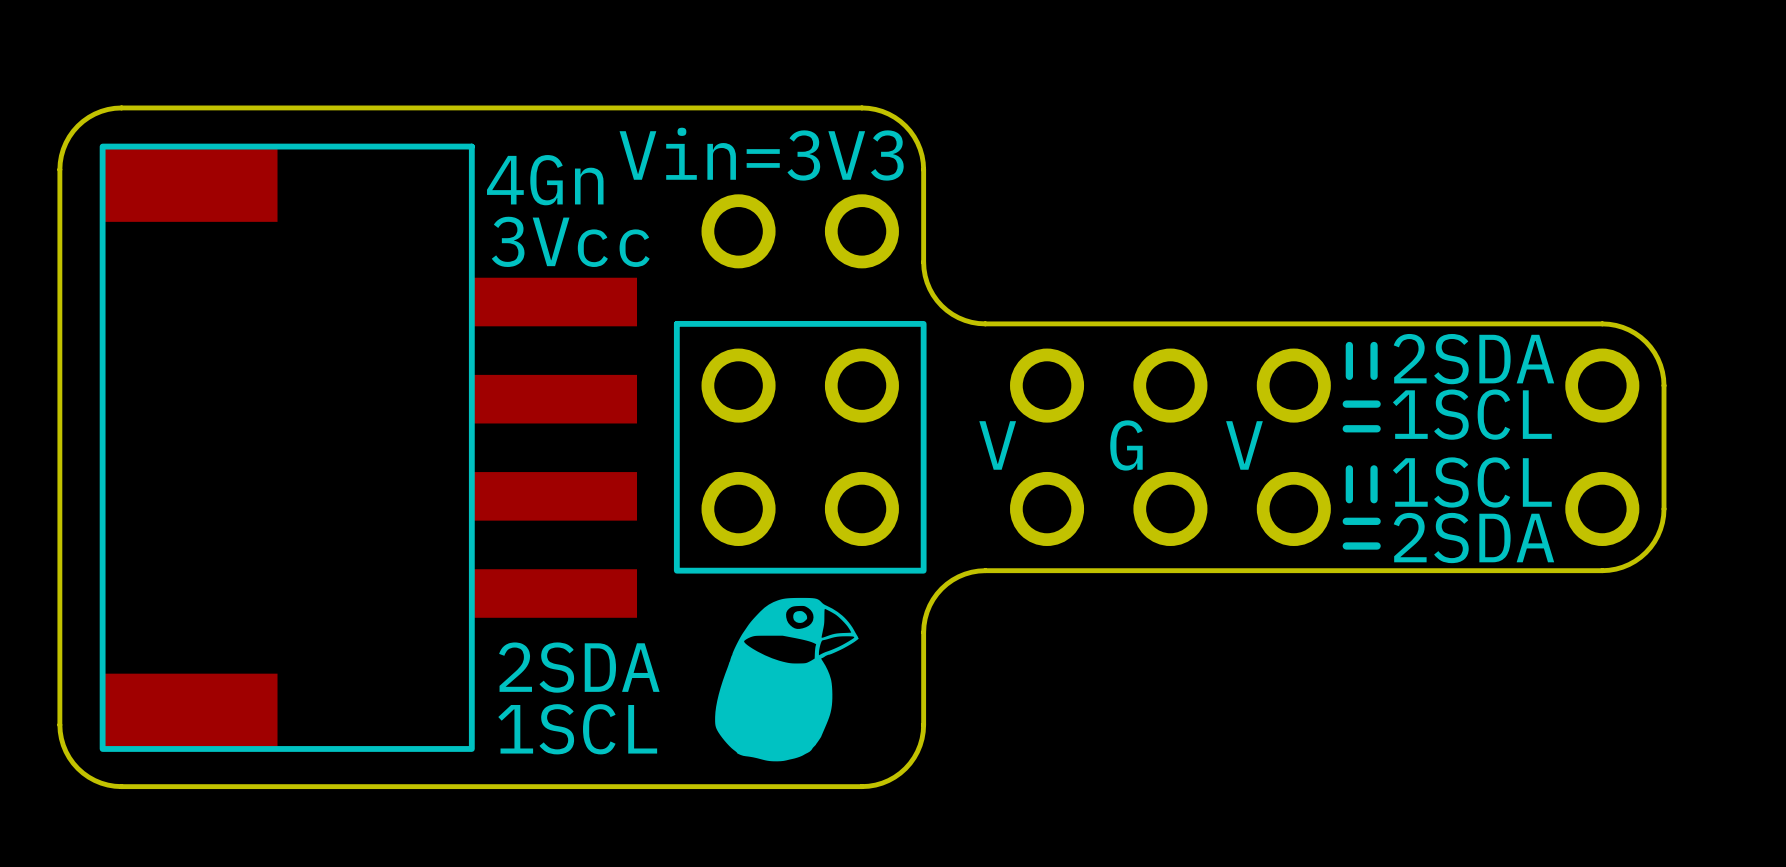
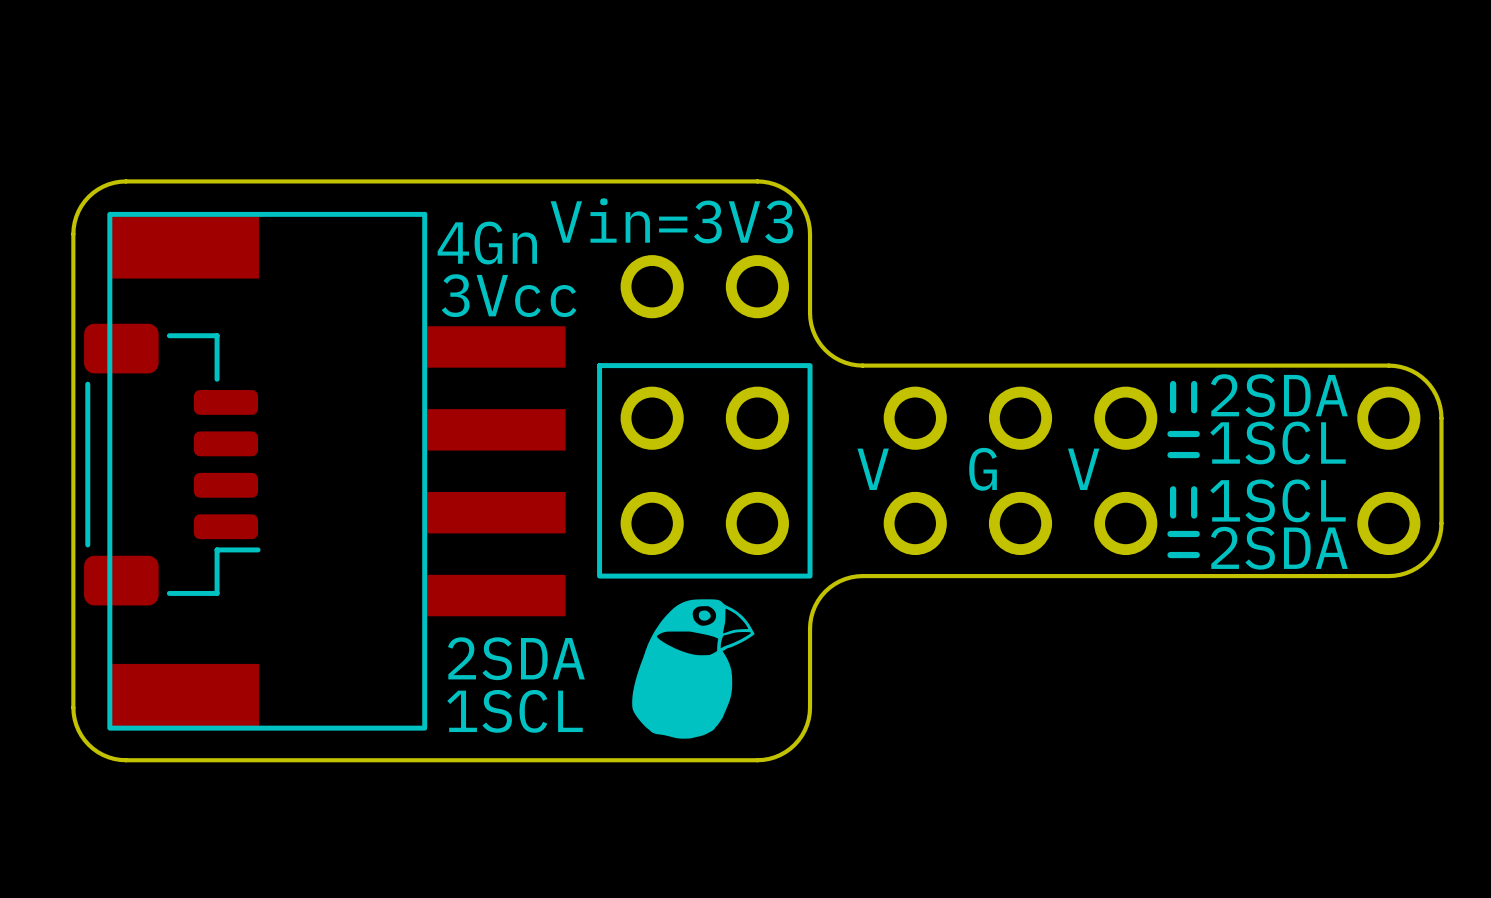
part: none -> (172, 464)

